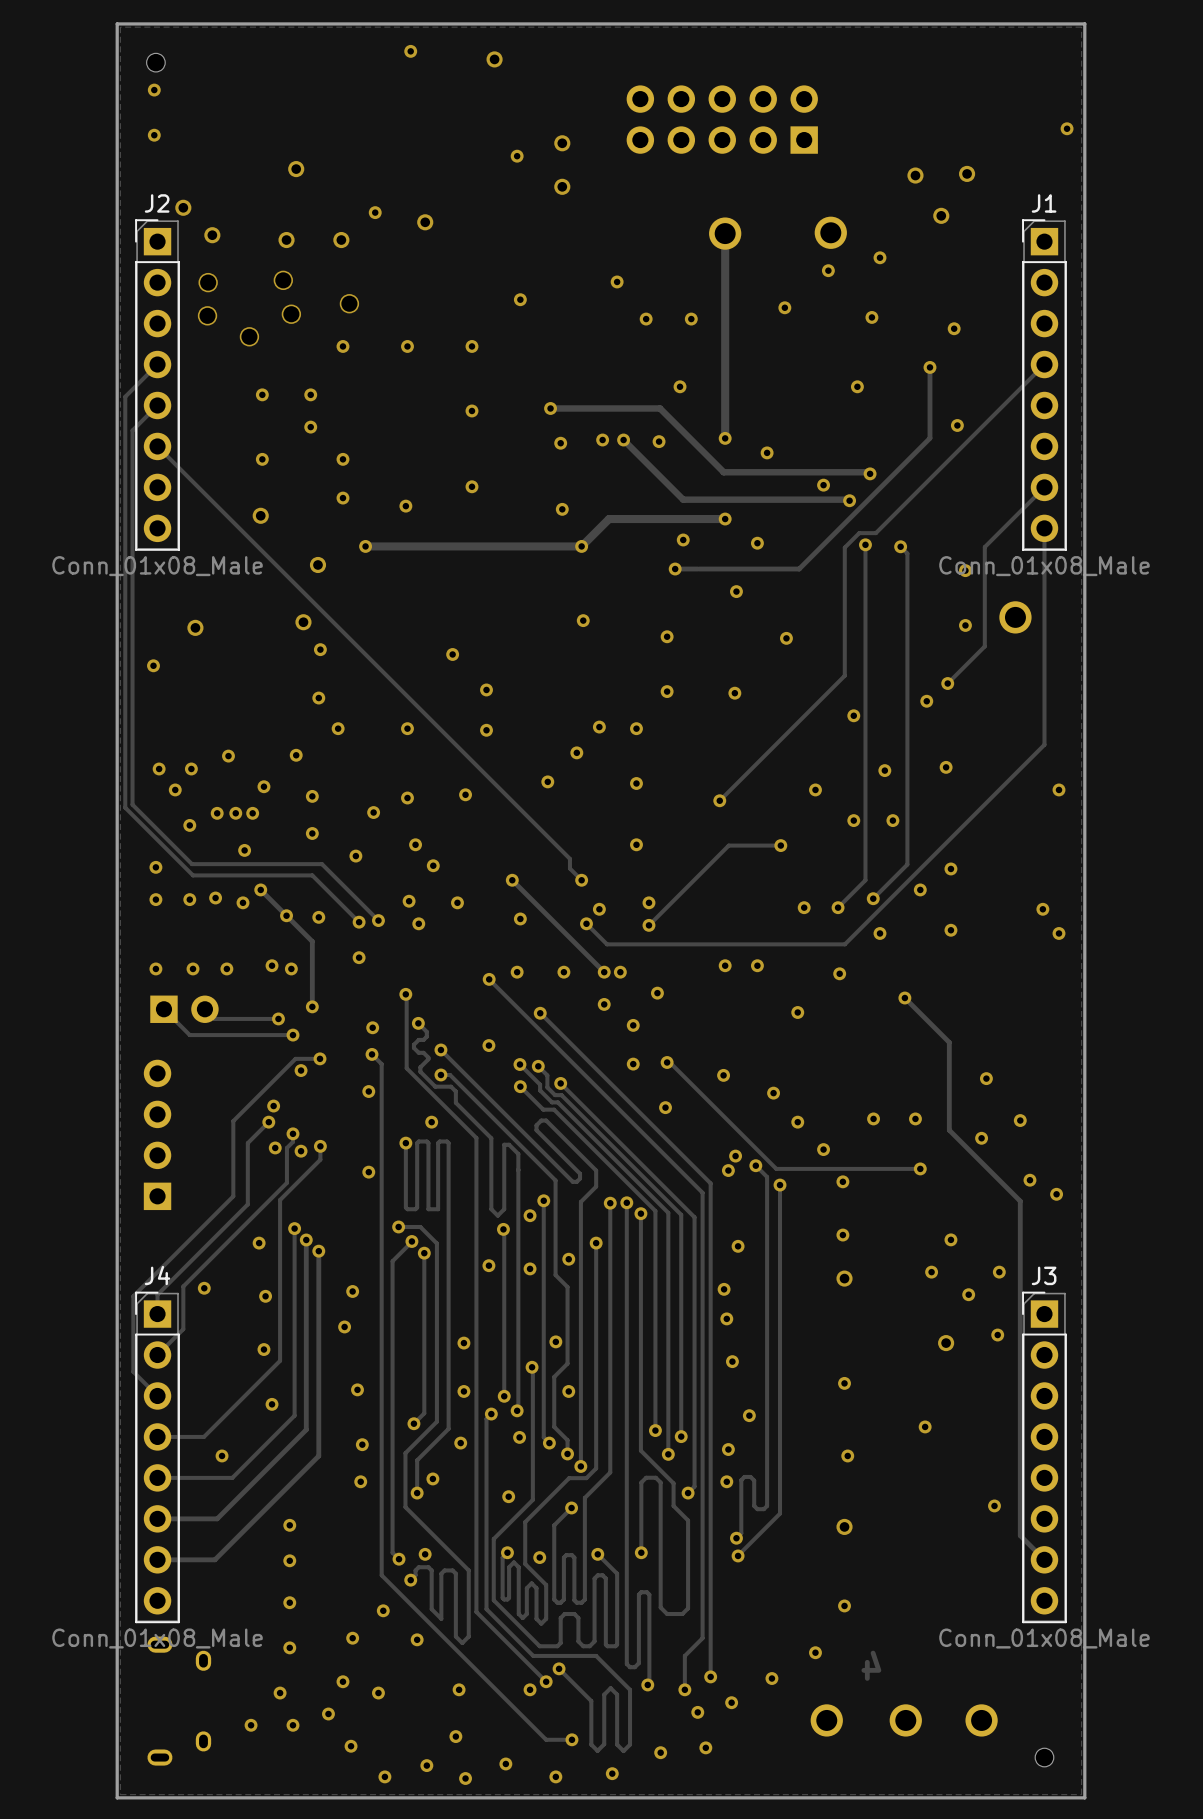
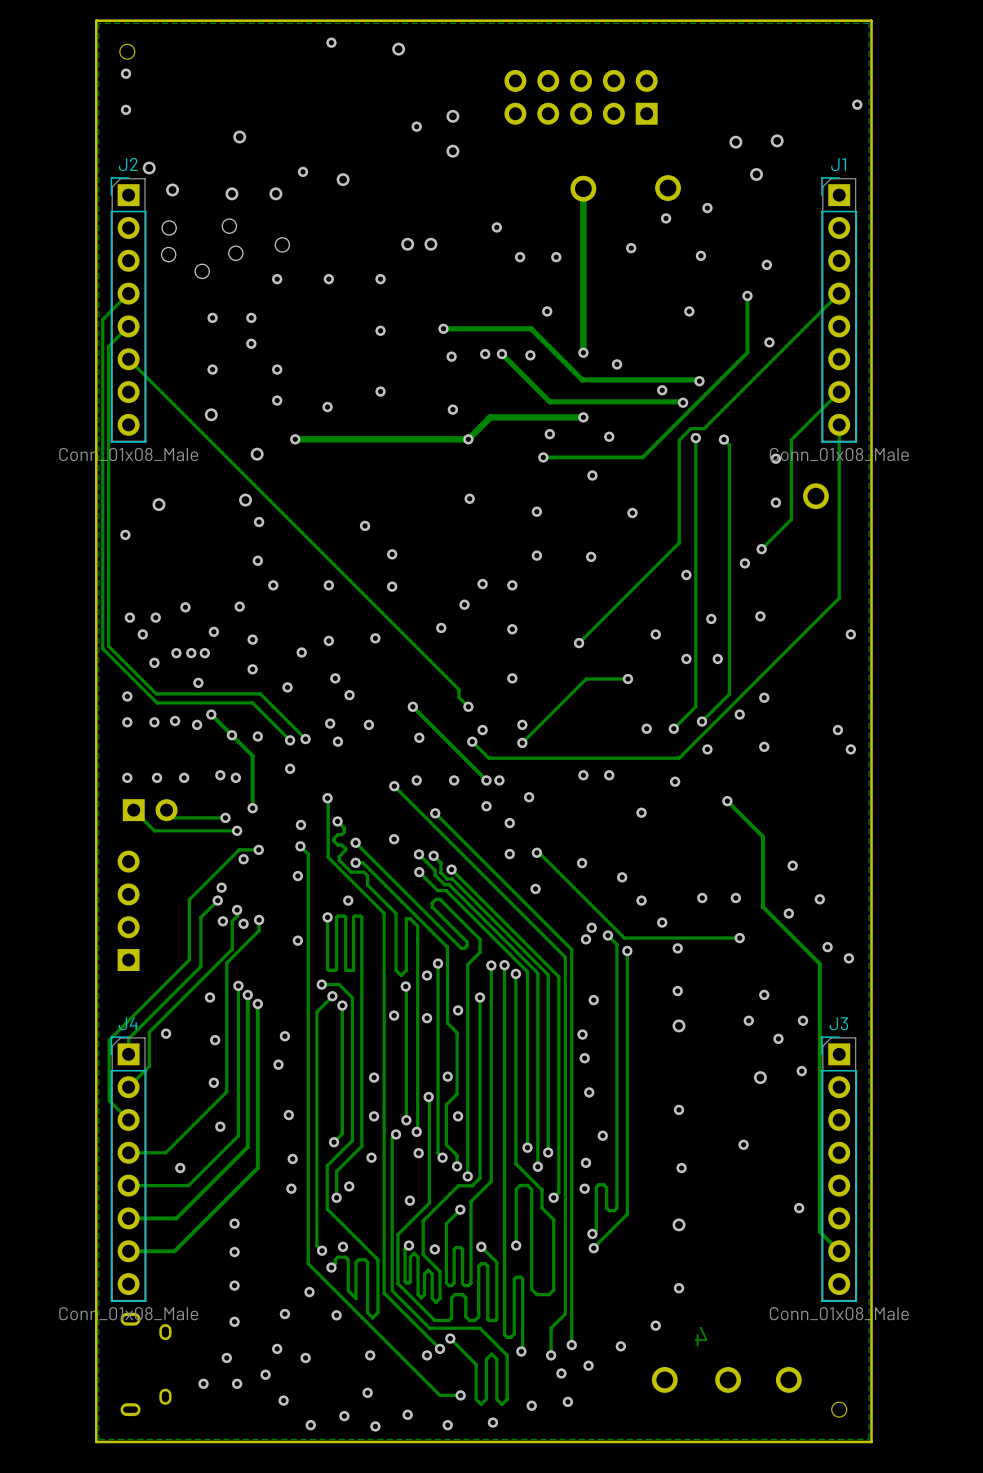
via: (520, 299) -> none
via: none -> (407, 244)
via: none -> (430, 244)

